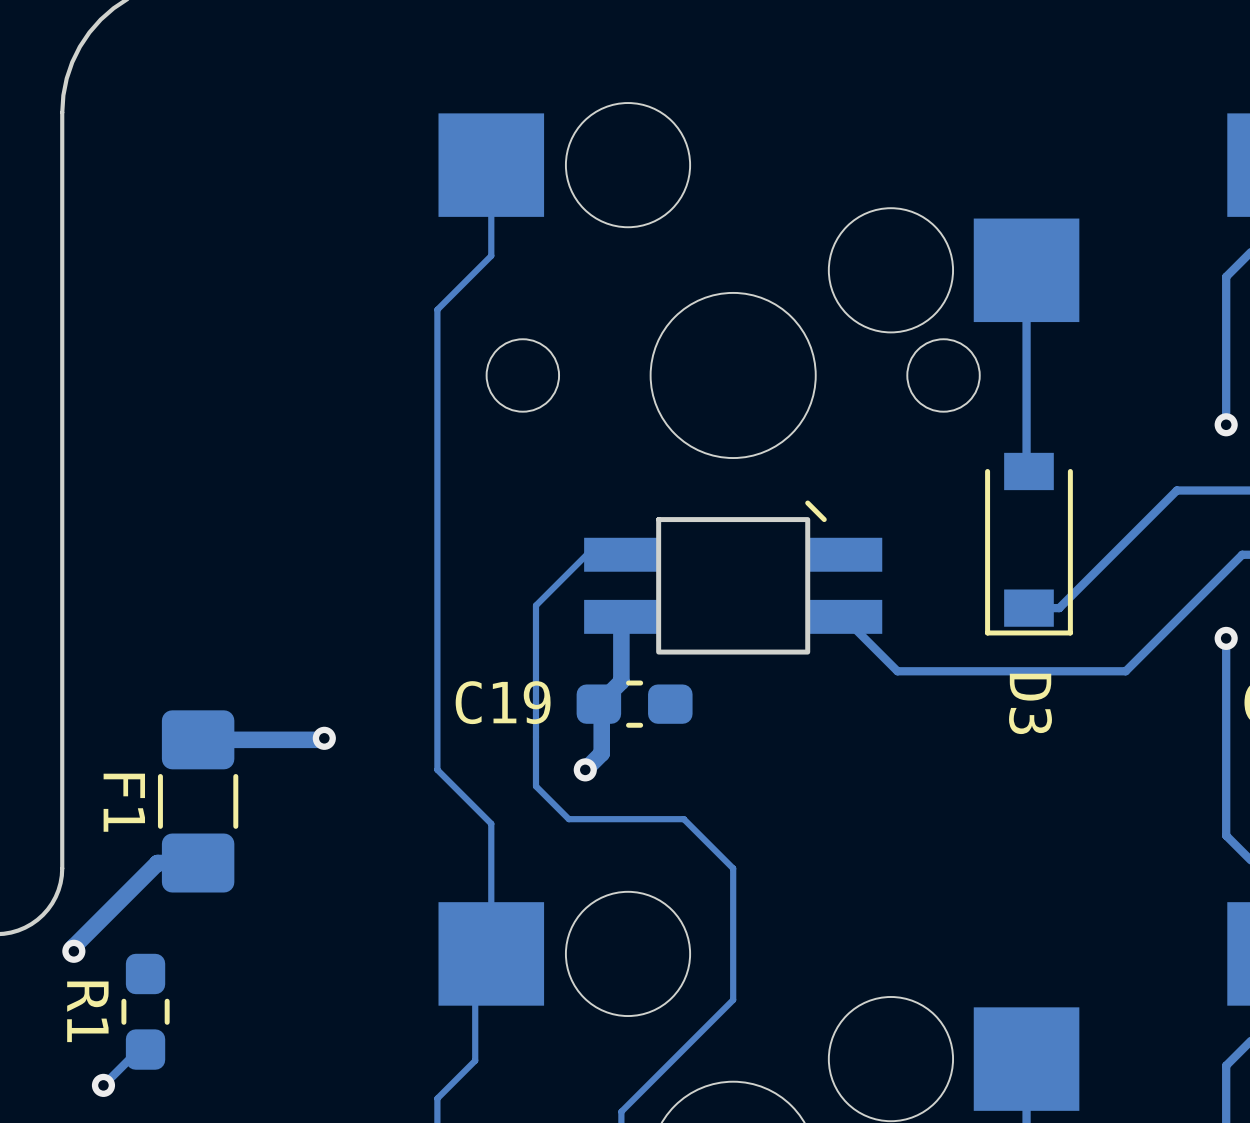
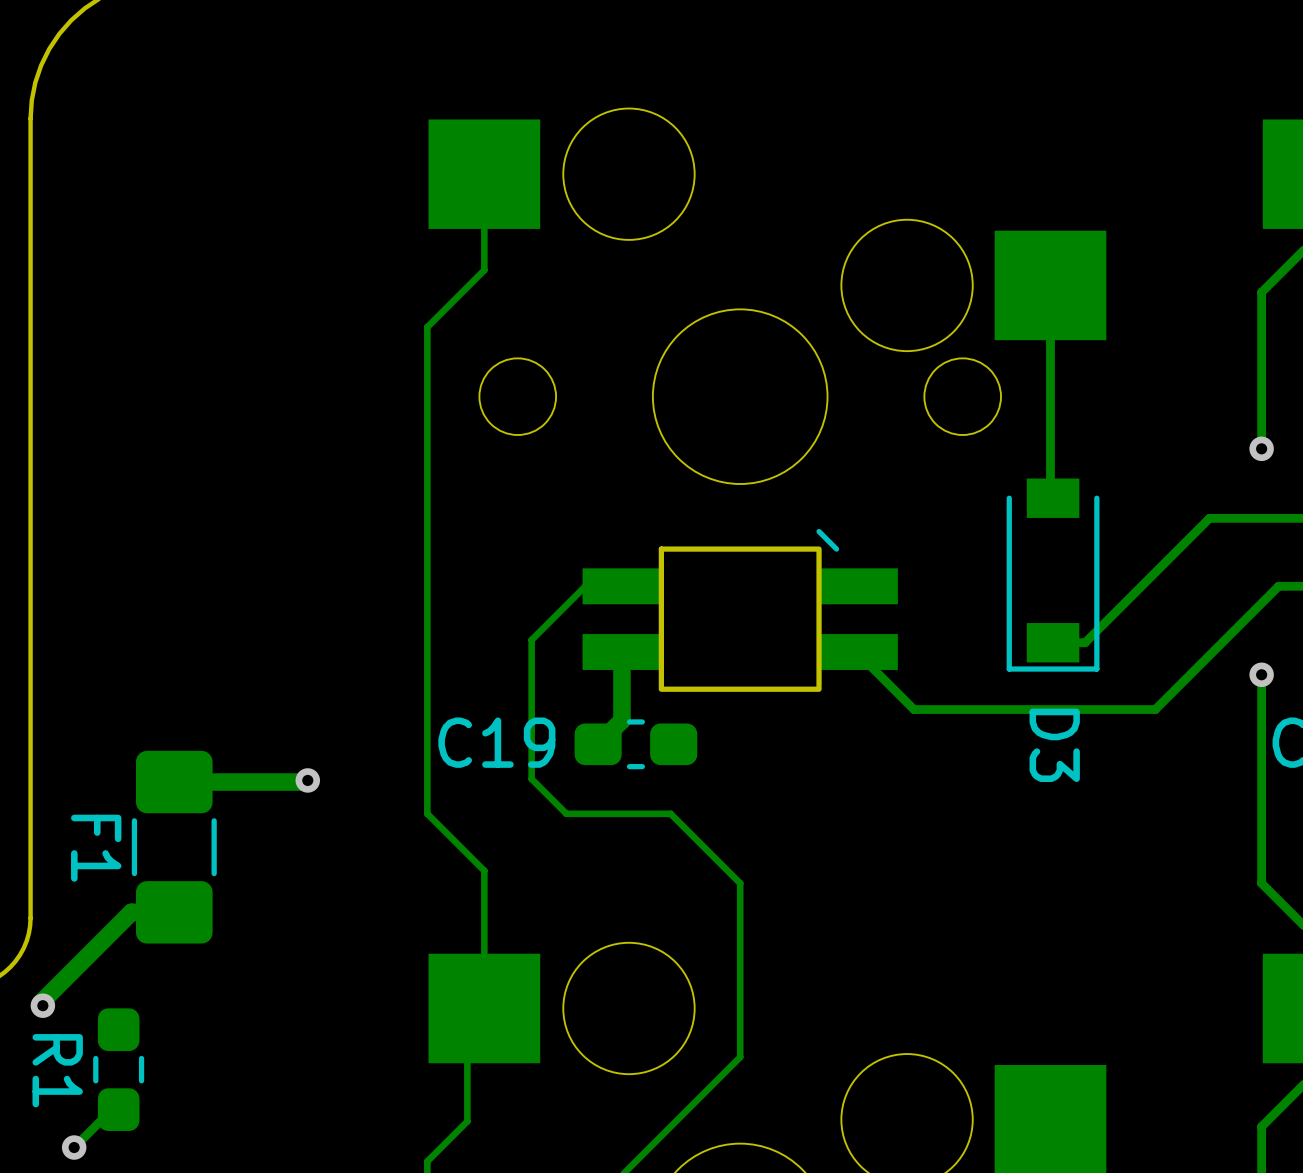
track: (601, 706) (601, 753) (585, 769) -> none
track: (535, 737) (535, 786) (568, 819) (683, 819) (733, 868) -> (531, 779) (566, 813) (670, 813) (740, 883) (740, 918)
via: (585, 769) -> none

